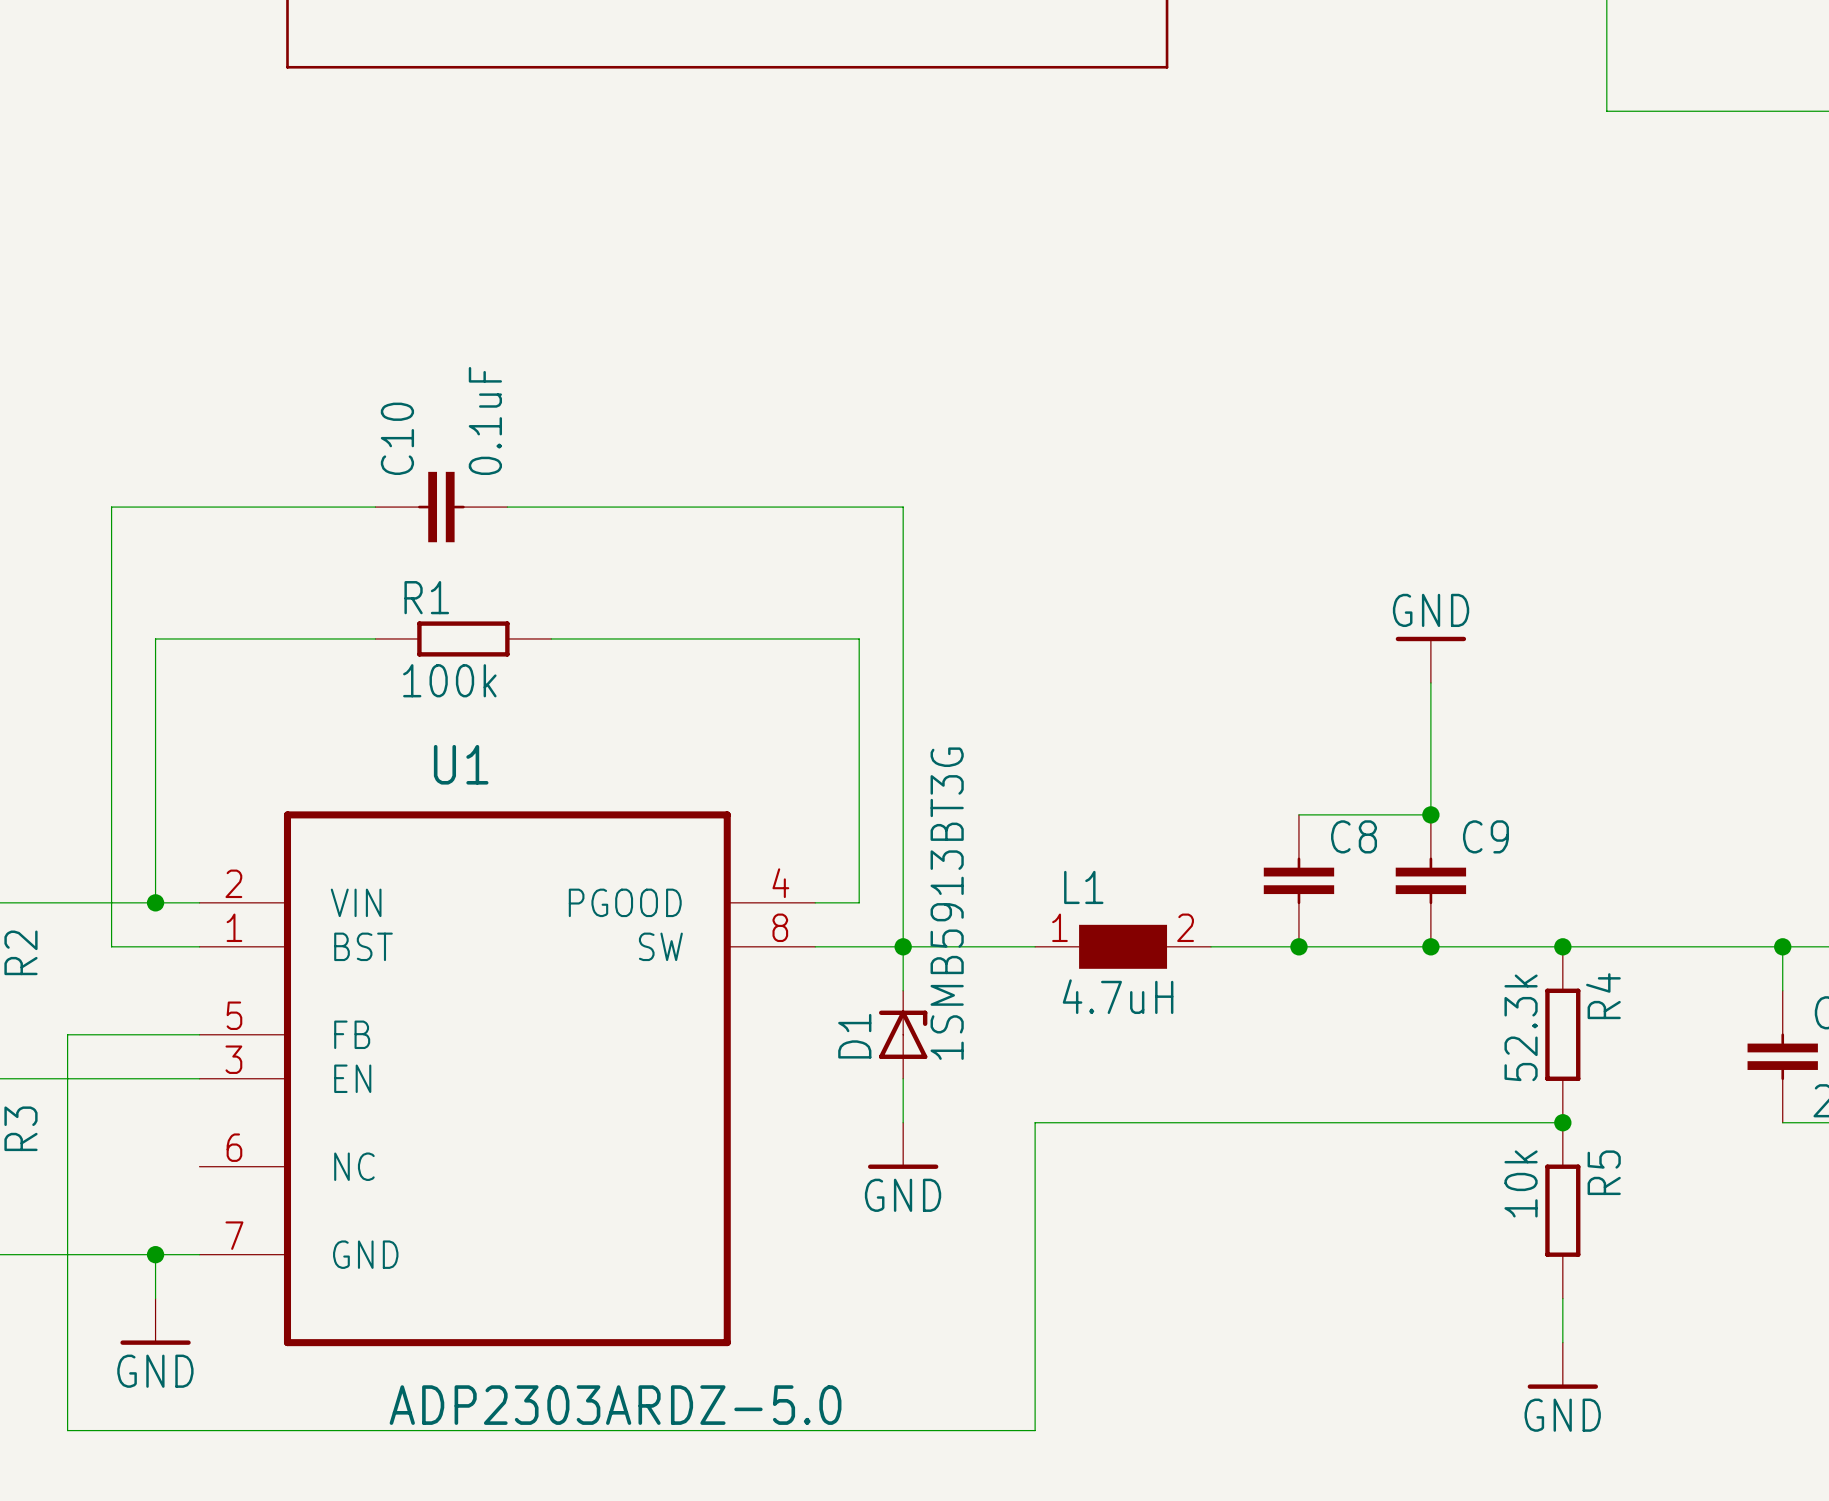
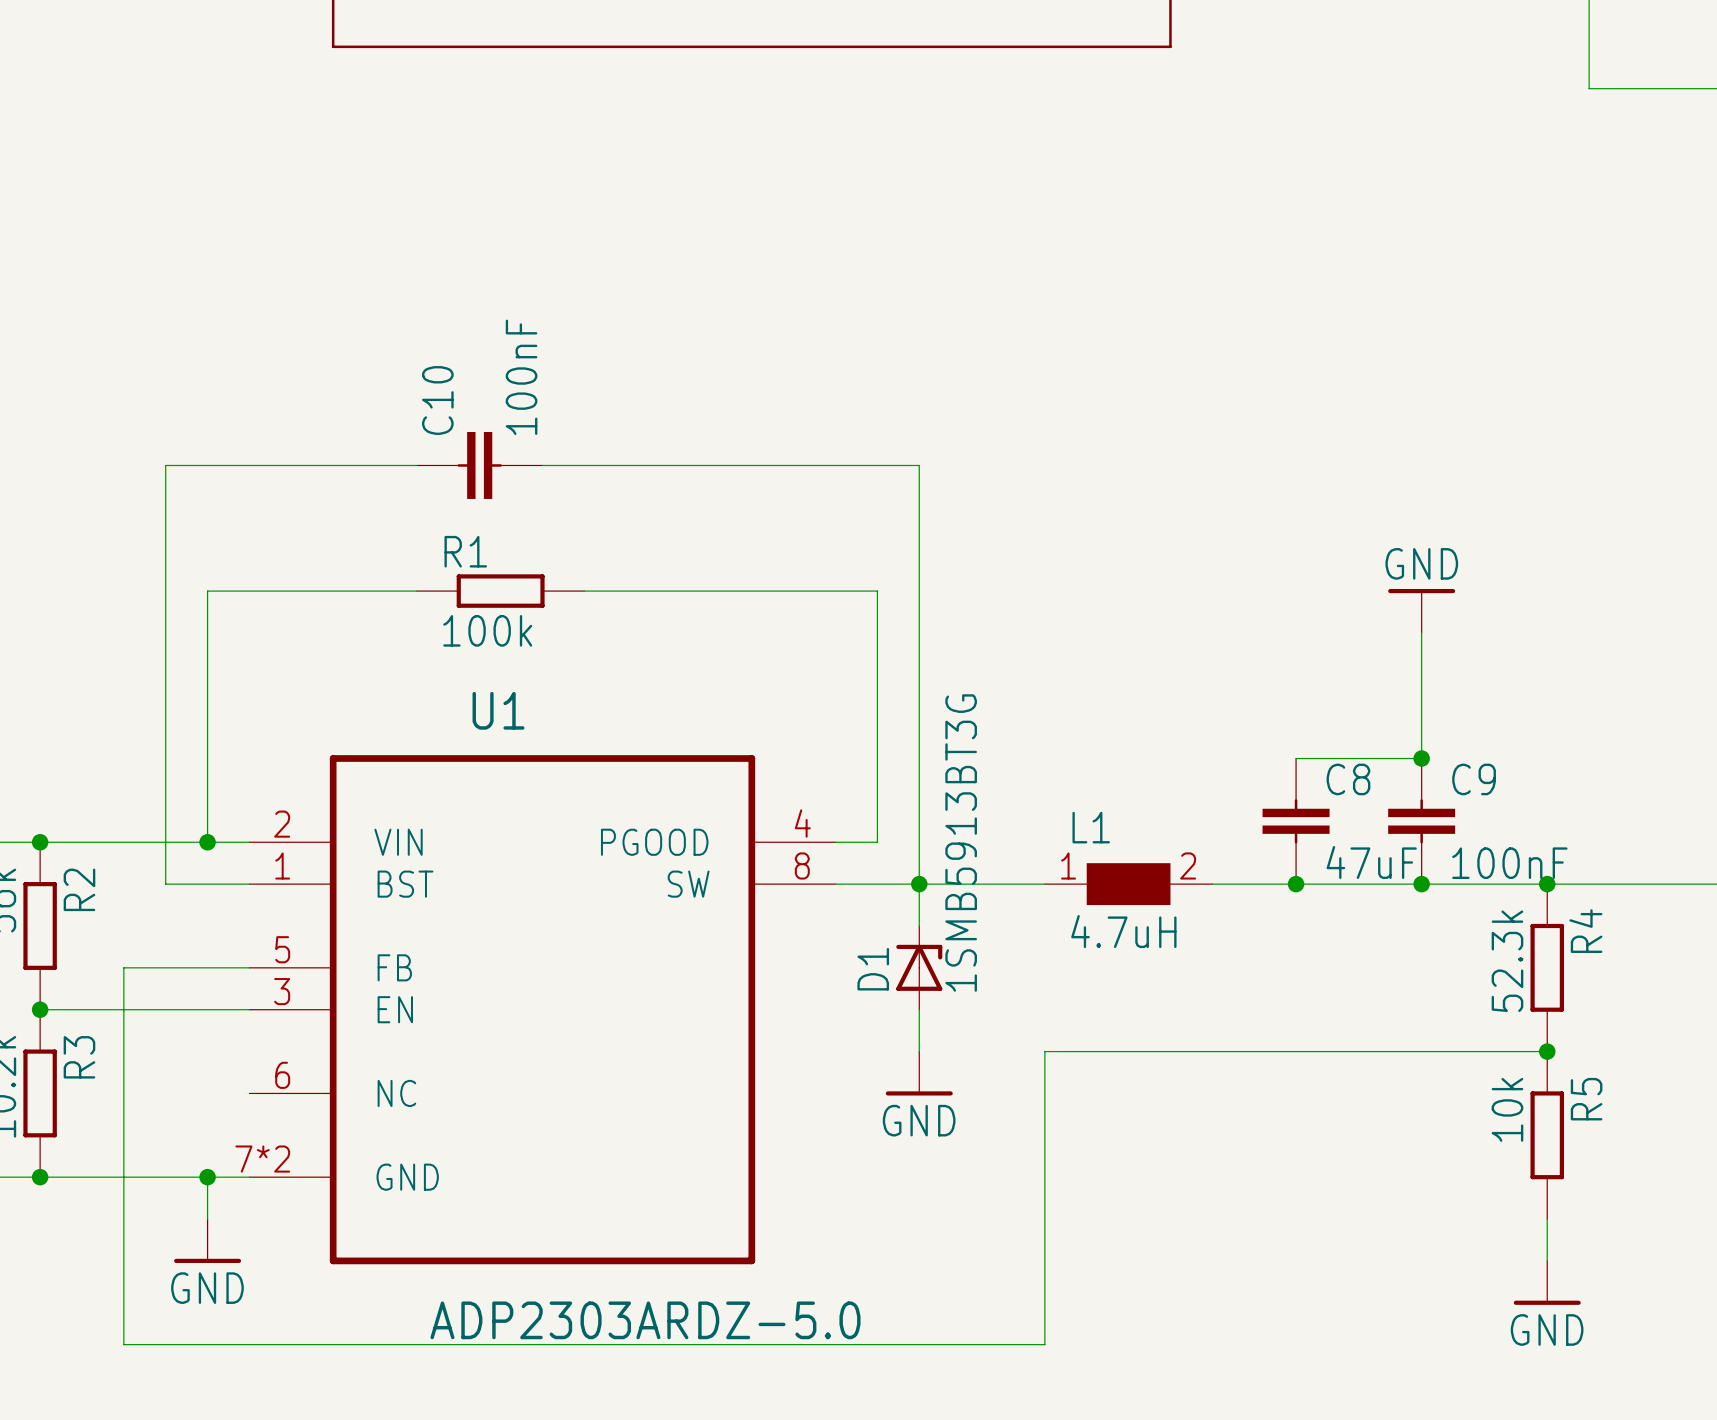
C10 value: 0.1uF (485, 420) -> 100nF (521, 377)
C8 value: none -> 47uF (1371, 862)
C9 value: none -> 100nF (1509, 863)
U1 pin number: 7 (234, 1235) -> 7*2 (262, 1159)

